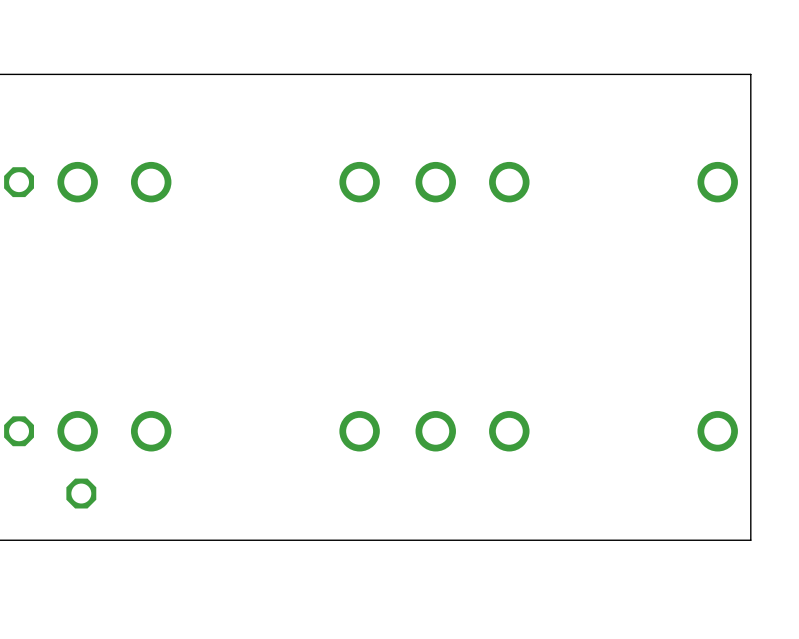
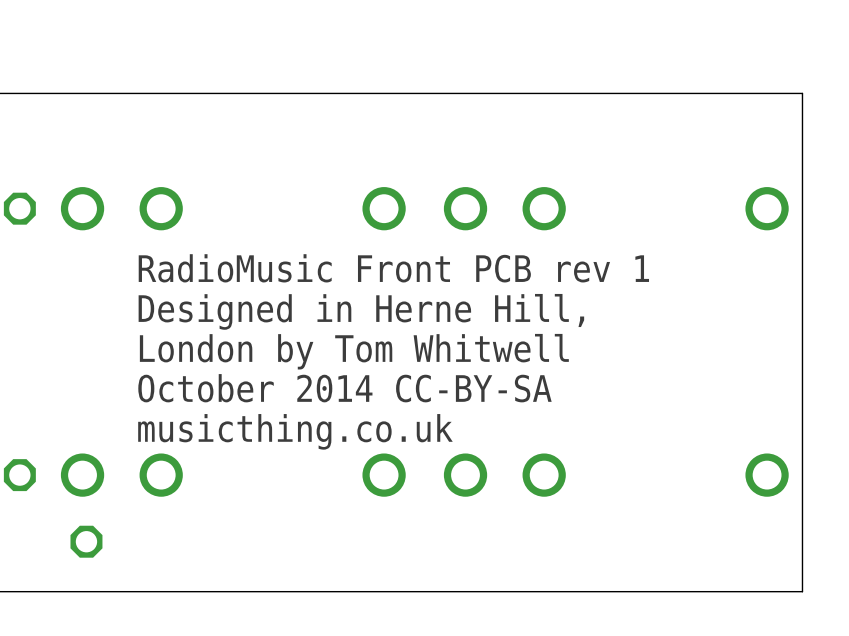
text: none -> RadioMusic Front PCB rev 1 (393, 268)
text: none -> Designed in Herne Hill, (361, 311)
text: none -> London by Tom Whitwell (354, 351)
text: none -> October 2014 CC-BY-SA (344, 388)
text: none -> musicthing.co.uk (295, 431)

